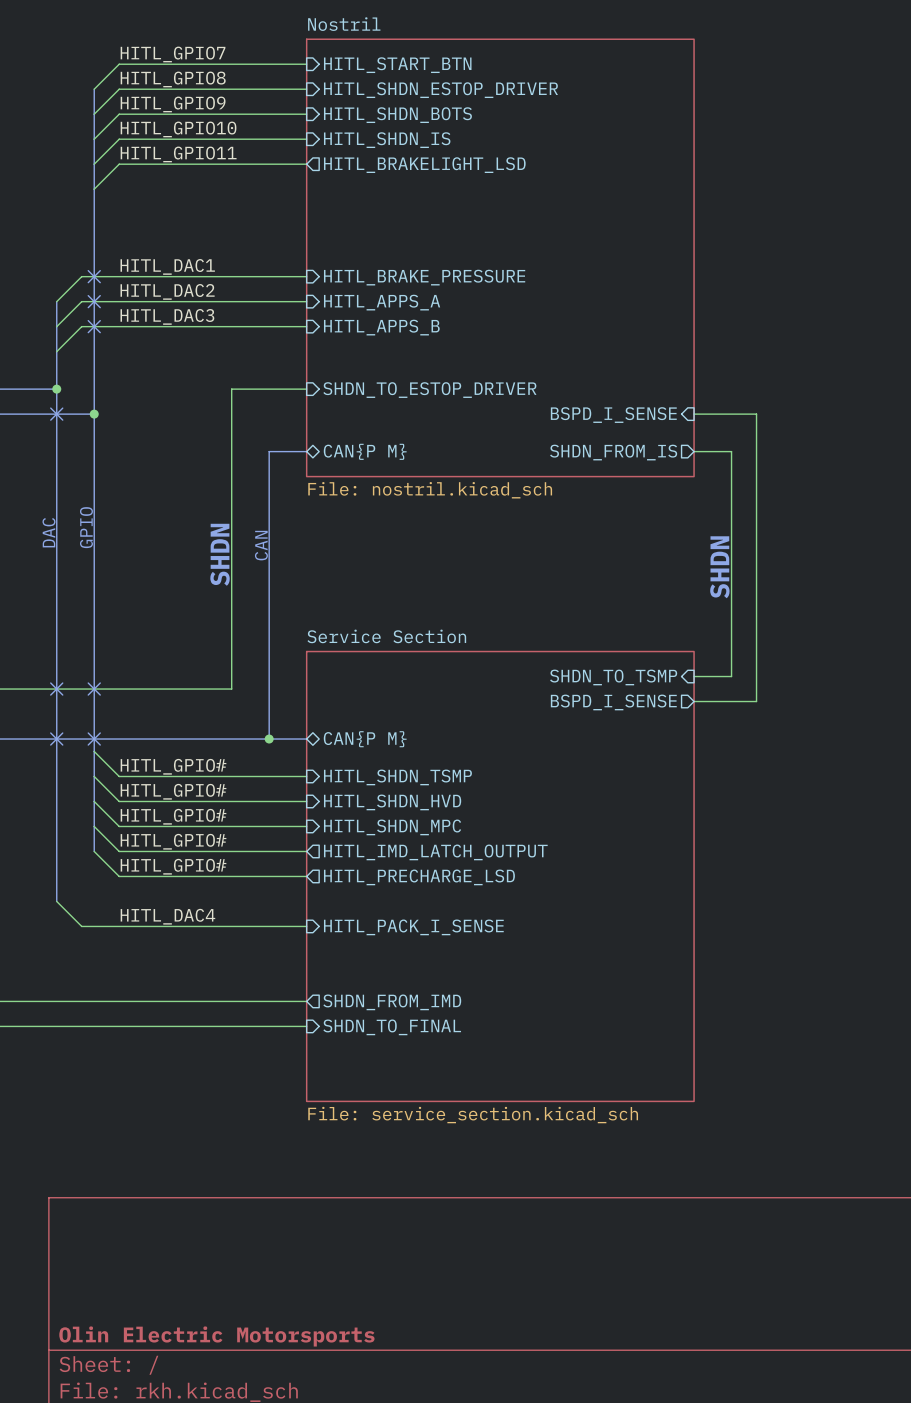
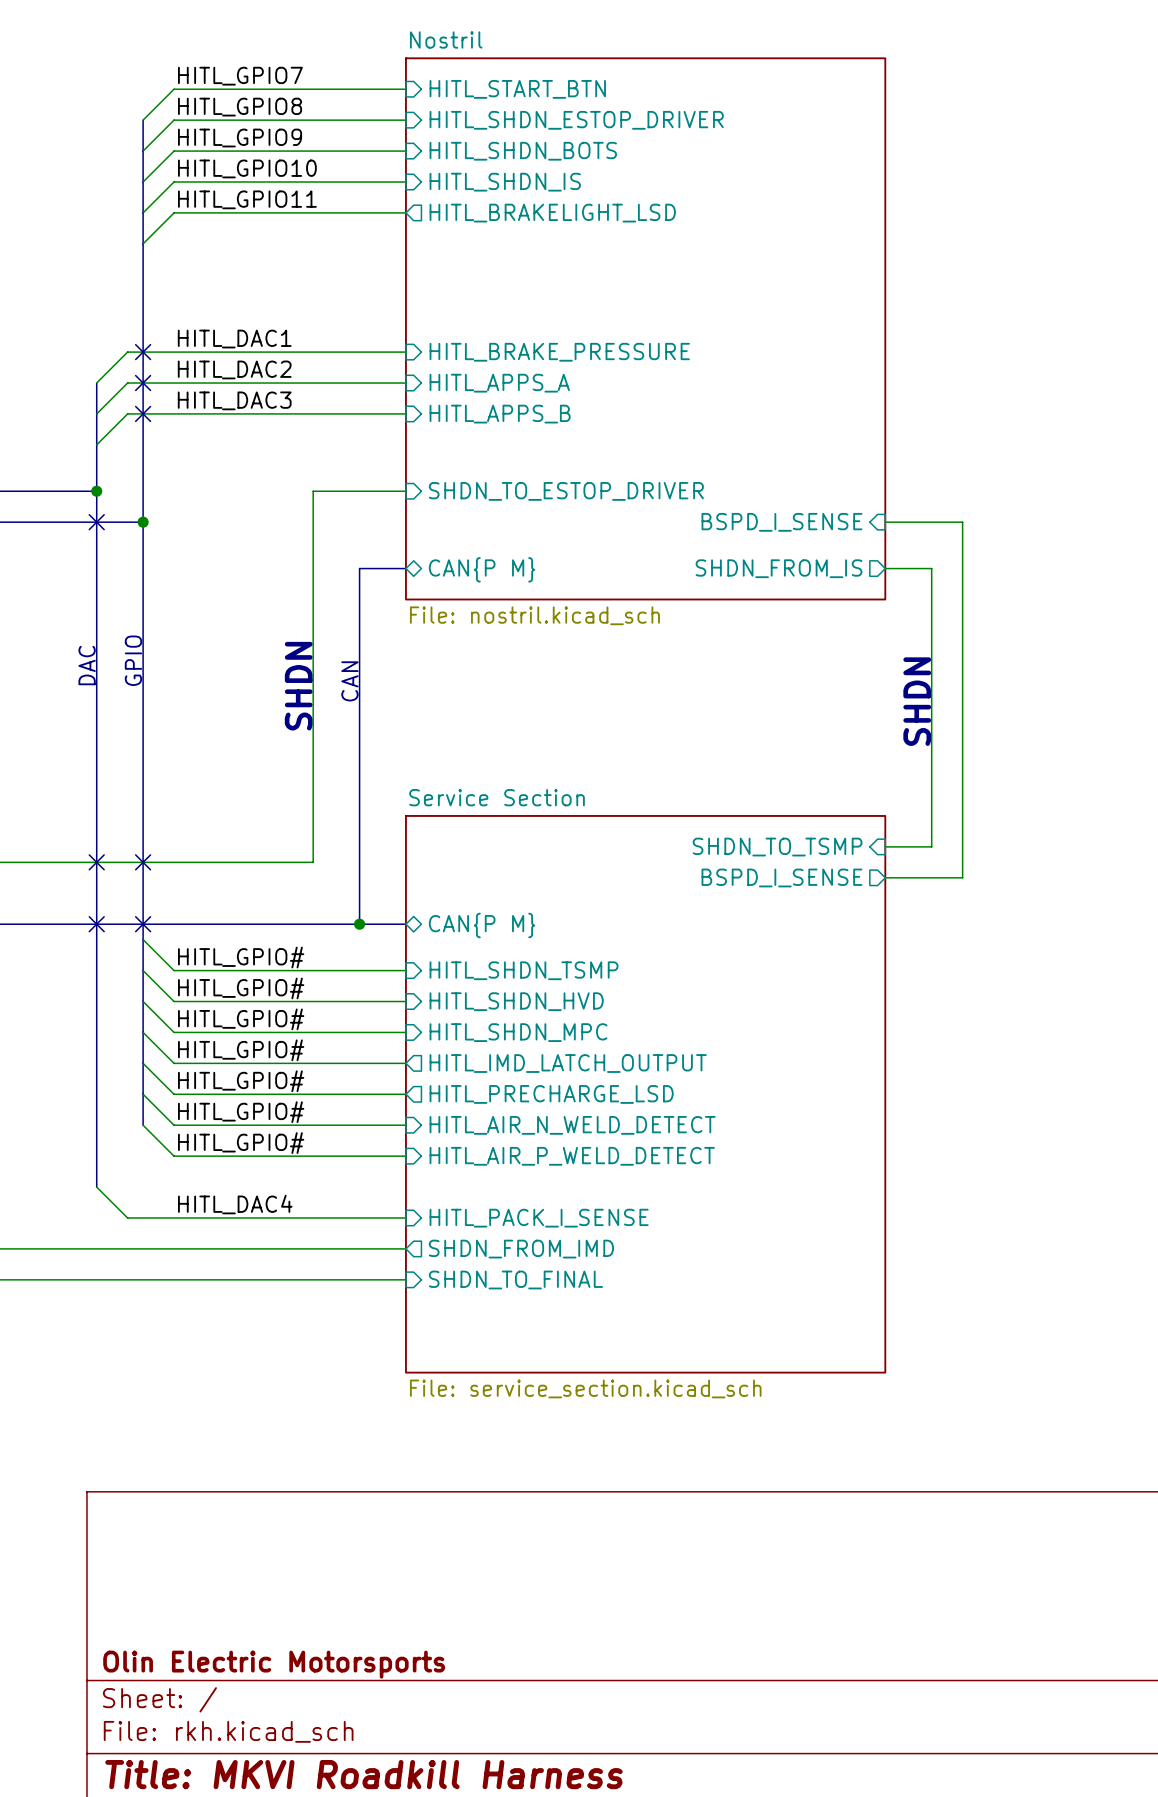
bus: none -> (143, 1063) (143, 1125)
wire: none -> (143, 1094) (174, 1125) (405, 1125)
label: none -> HITL_GPIO# (241, 1112)
wire: (56, 901) (81, 926) (119, 926) -> (143, 1125) (174, 1156)
bus: none -> (96, 1125) (96, 1187)
sheet pin: none -> HITL_AIR_N_WELD_DETECT (572, 1125)
label: HITL_DAC4 (167, 916) -> HITL_GPIO# (241, 1143)
sheet pin: HITL_PACK_I_SENSE (413, 927) -> HITL_AIR_P_WELD_DETECT (572, 1156)
wire: none -> (96, 1187) (127, 1217) (405, 1217)
label: none -> HITL_DAC4 (235, 1204)
sheet pin: none -> HITL_PACK_I_SENSE (539, 1218)

